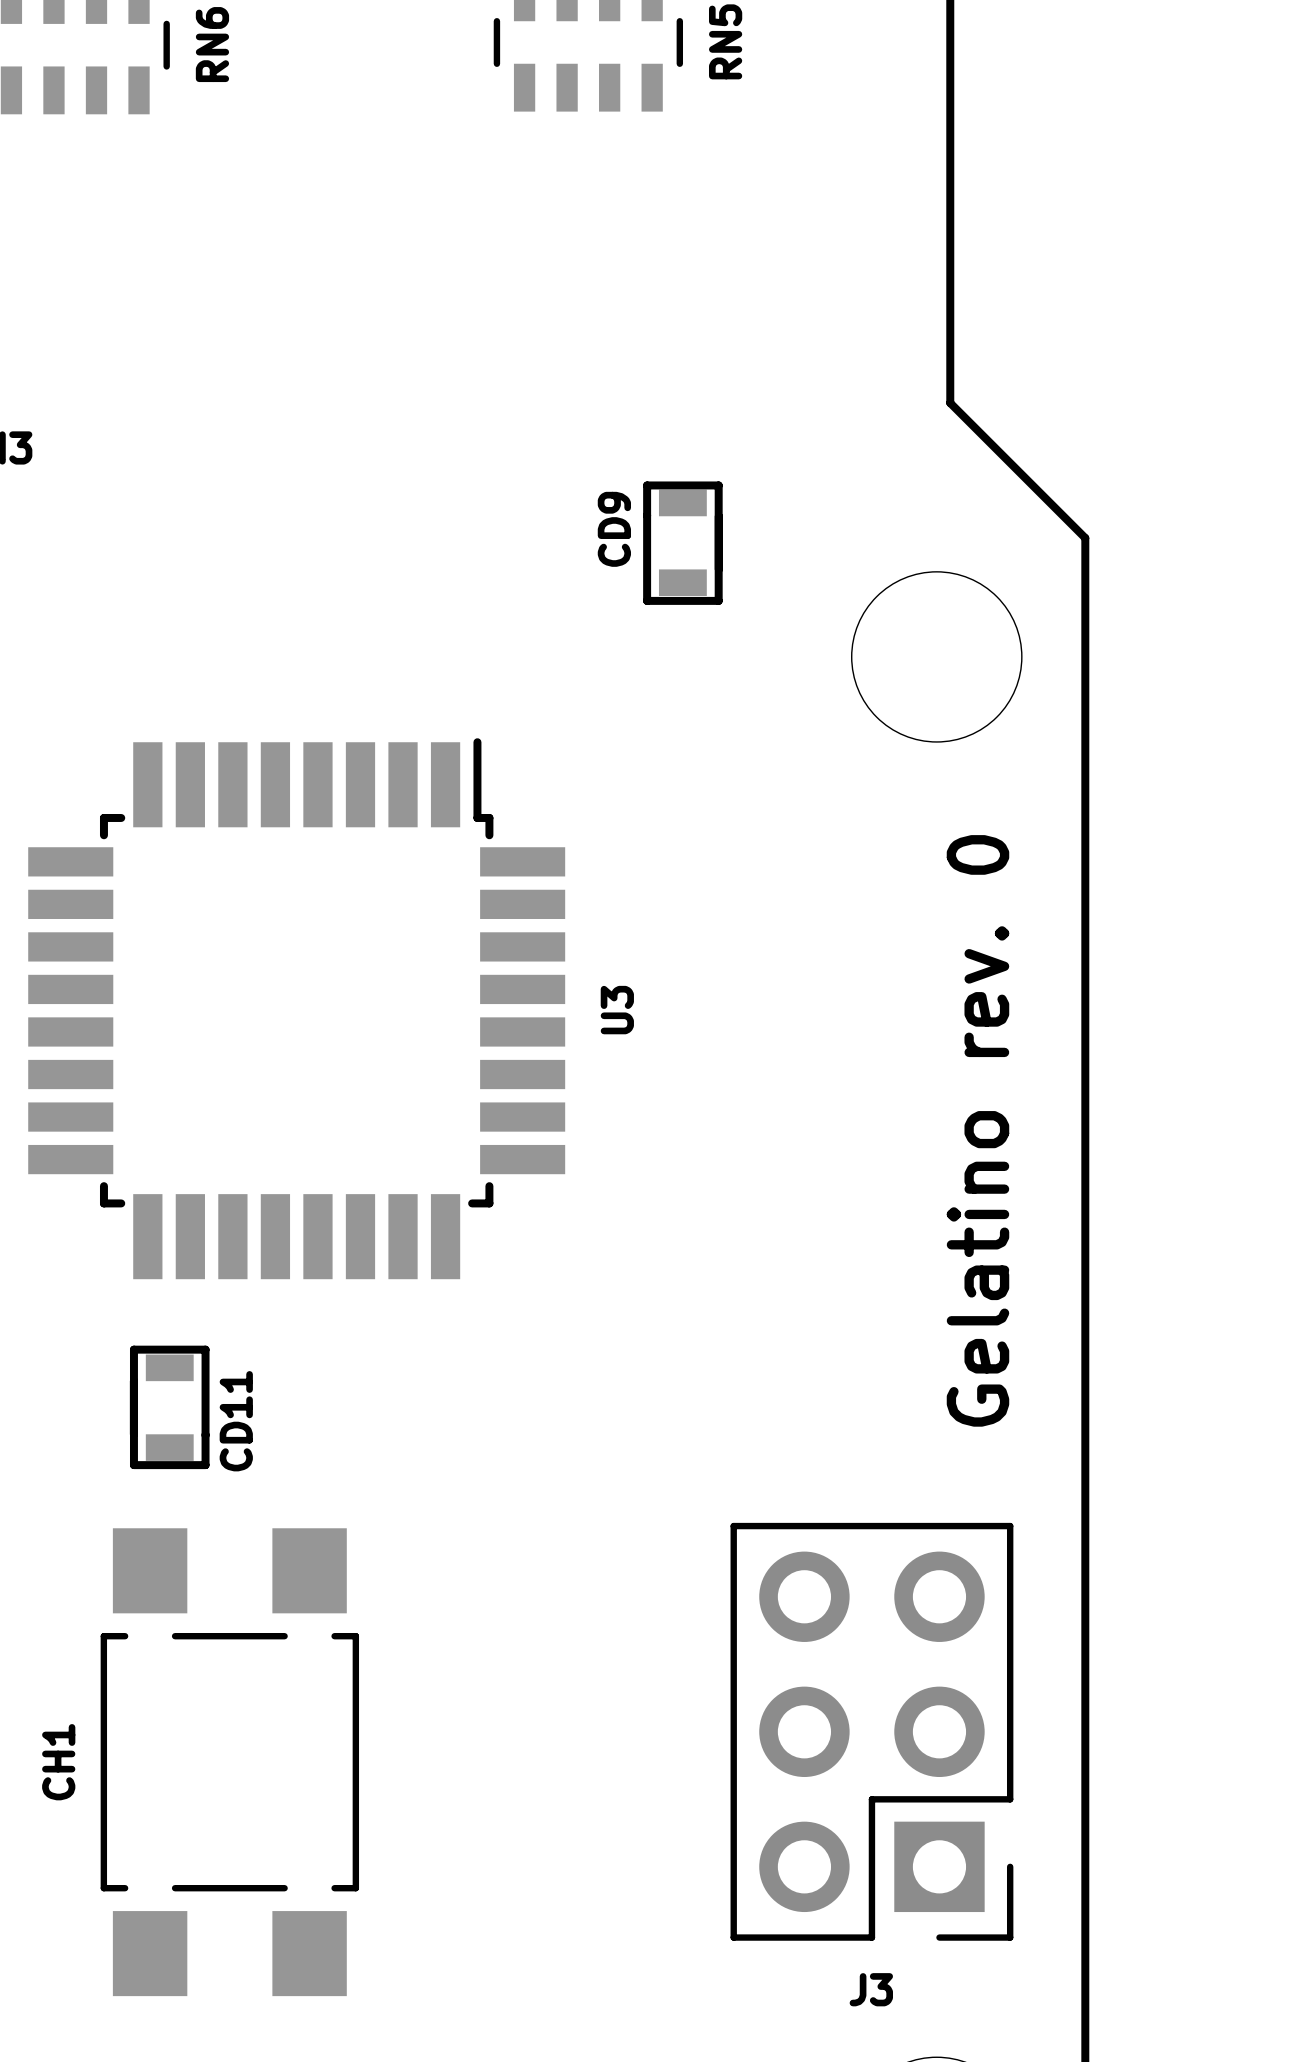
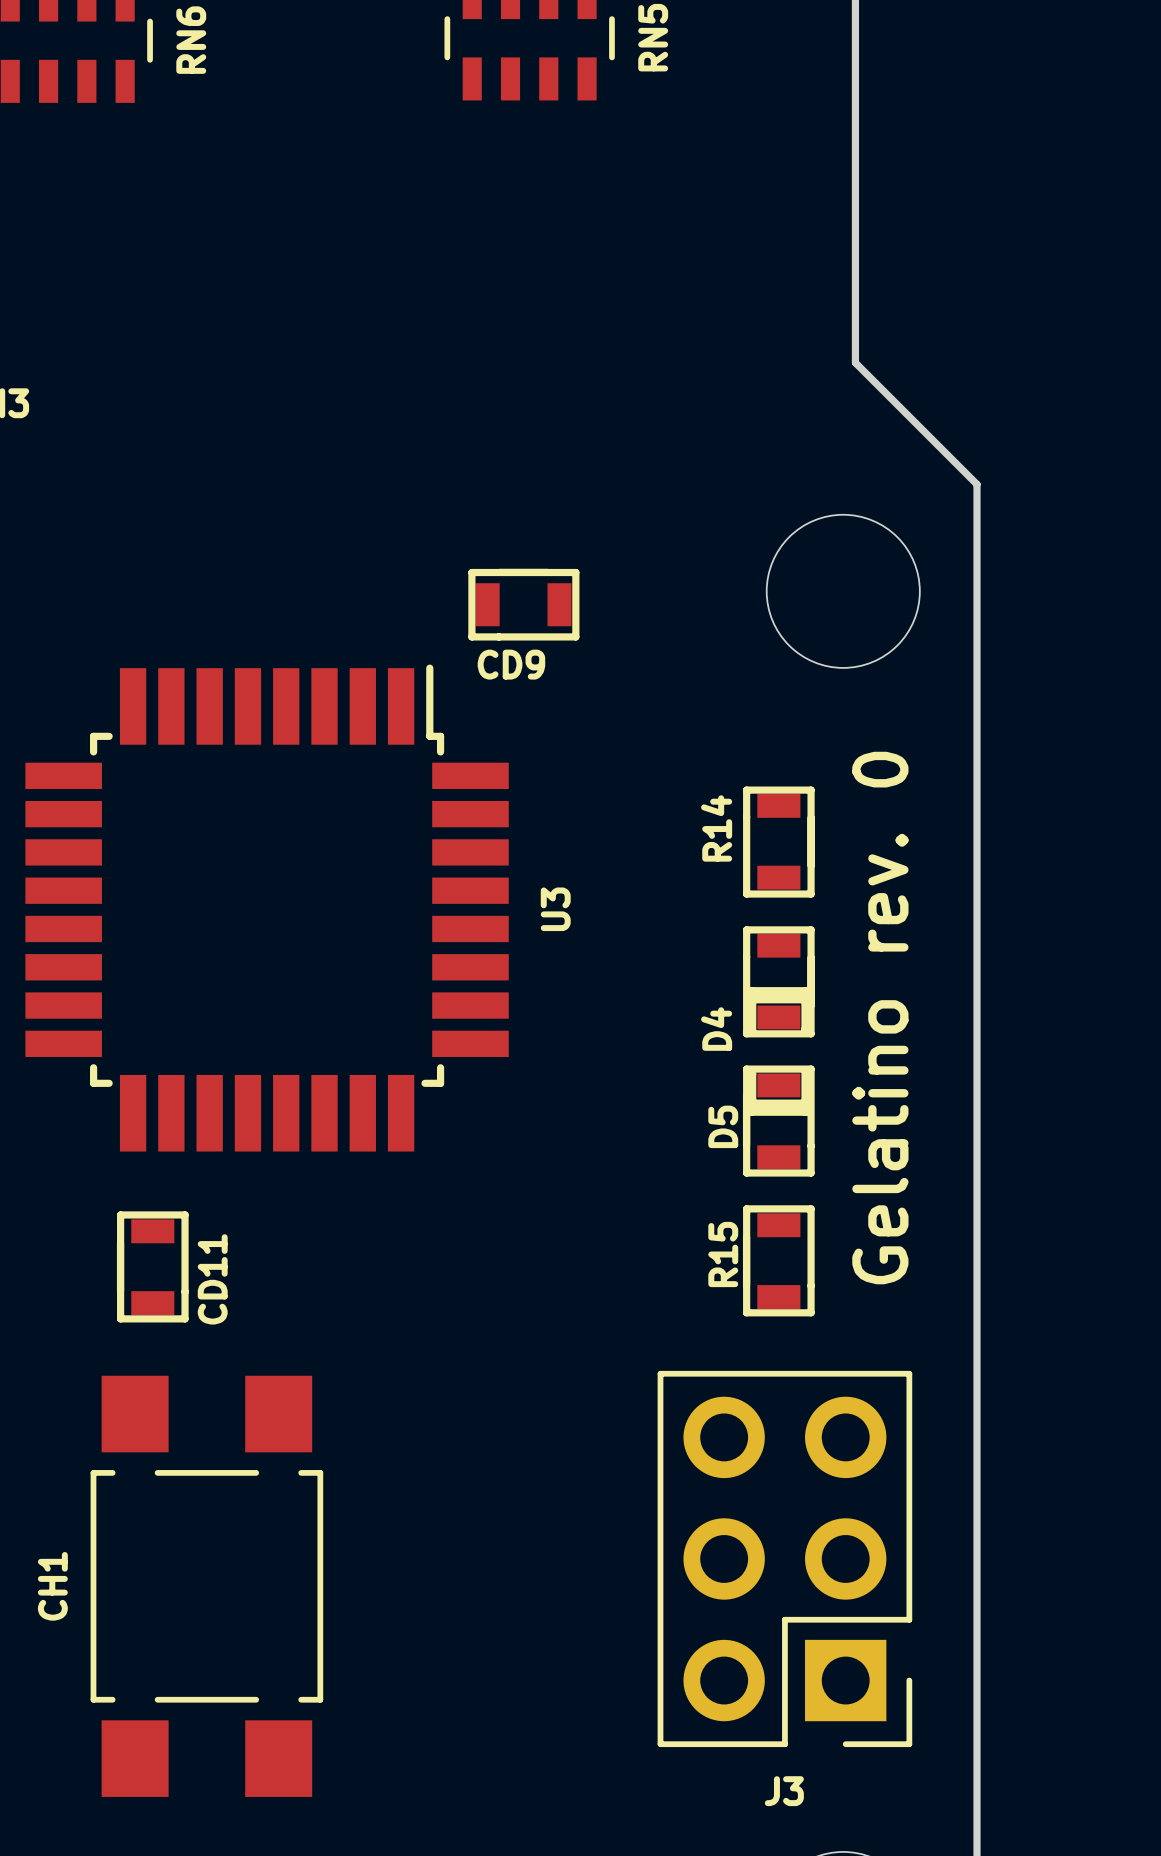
CD9 rotation: 0° (682, 543) -> 90° counterclockwise (523, 604)
CD9 position: (682, 543) -> (523, 604)
R14: none -> (778, 842)
D4: none -> (778, 981)
D5: none -> (778, 1121)
R15: none -> (778, 1260)

